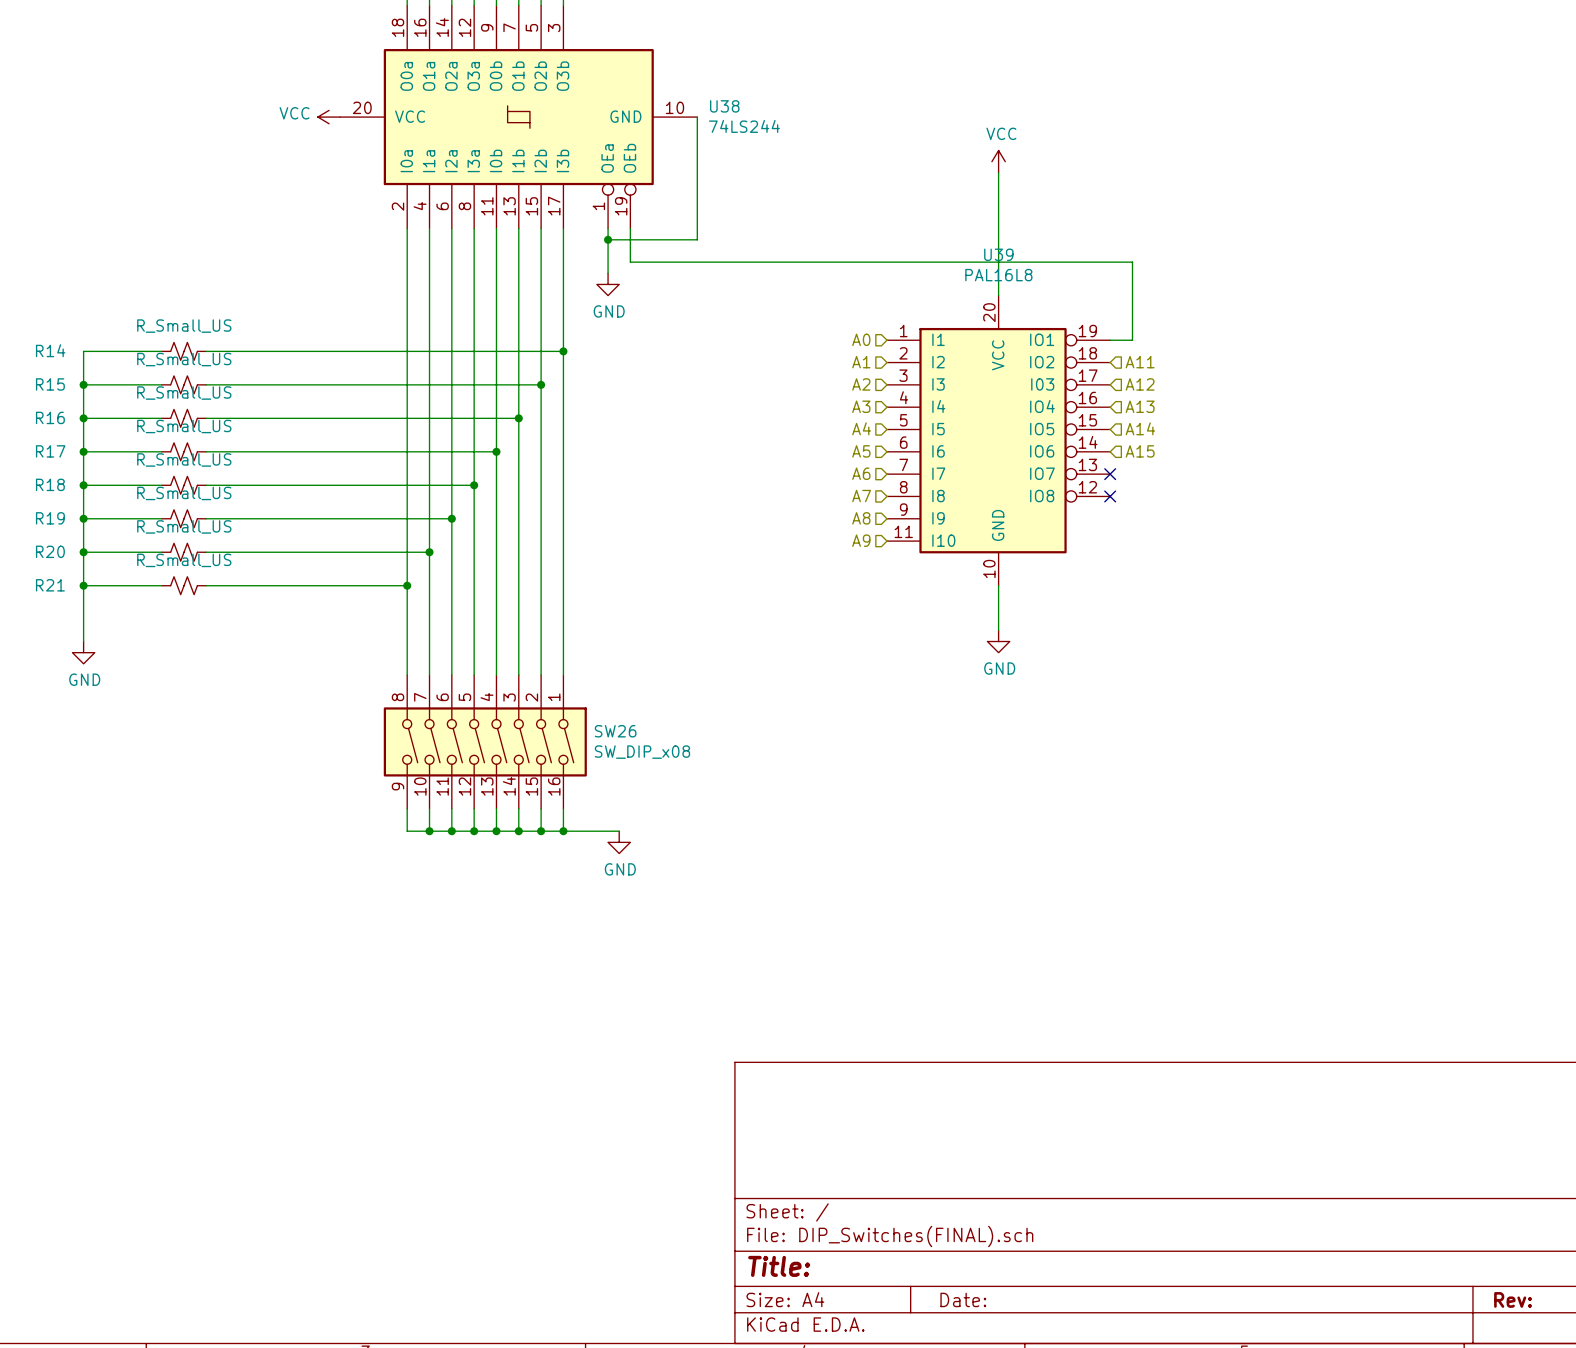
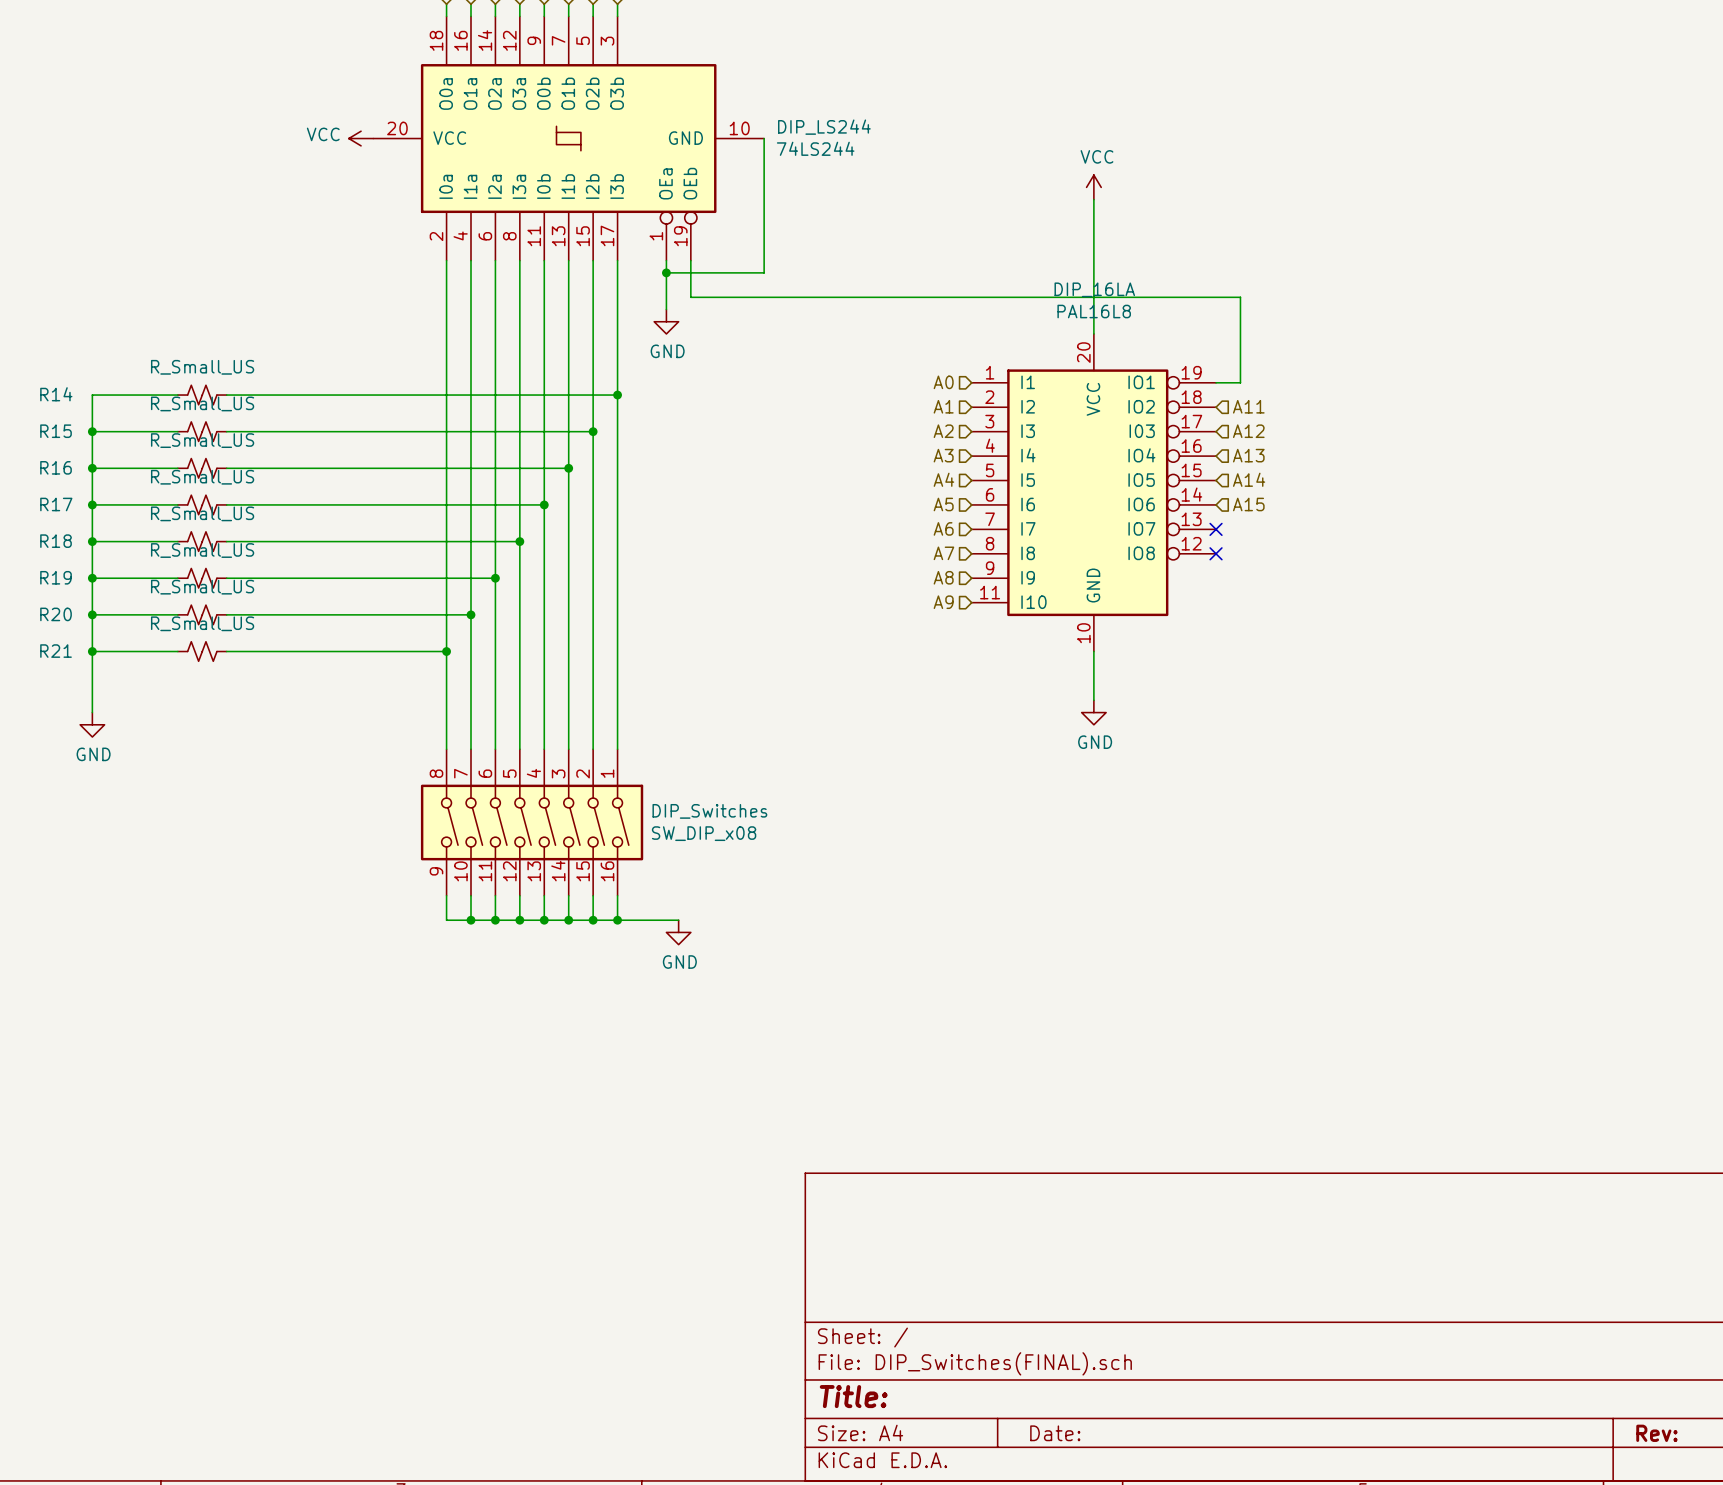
U38 name: U38 (724, 106) -> DIP_LS244 (824, 127)
U39 name: U39 (998, 254) -> DIP_16LA (1094, 289)
SW26 name: SW26 (615, 731) -> DIP_Switches (709, 811)

